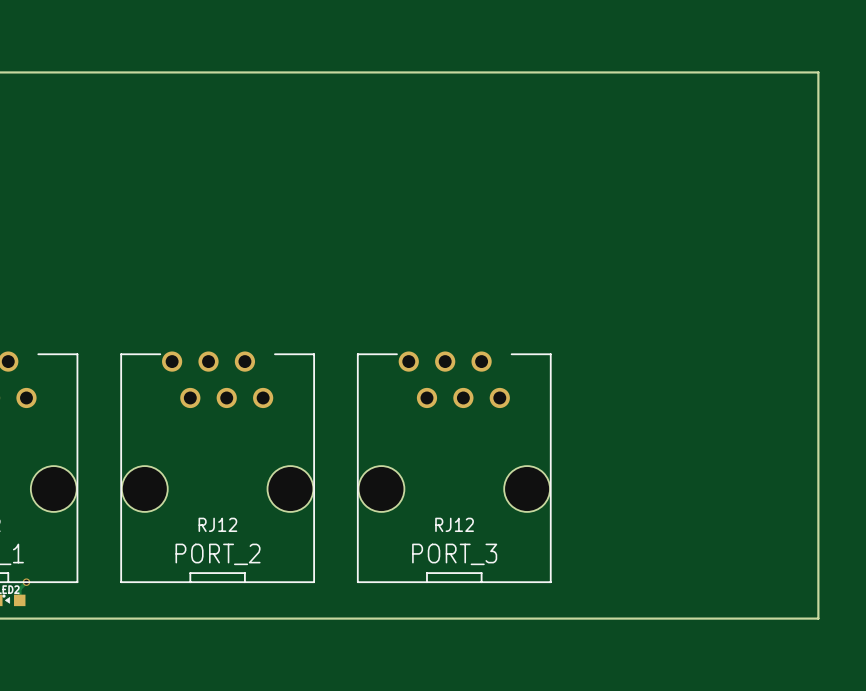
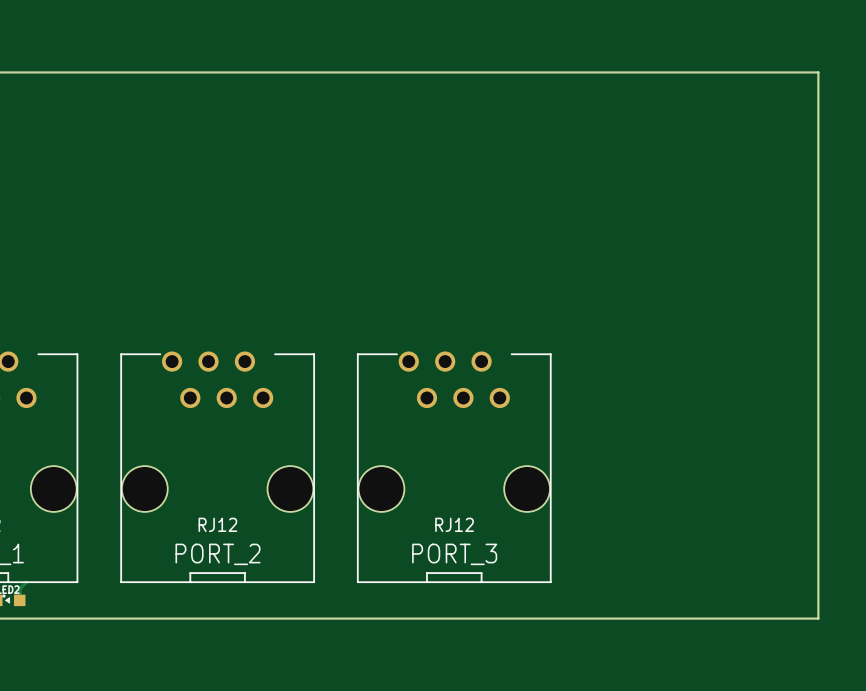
via: (26, 582) -> none

